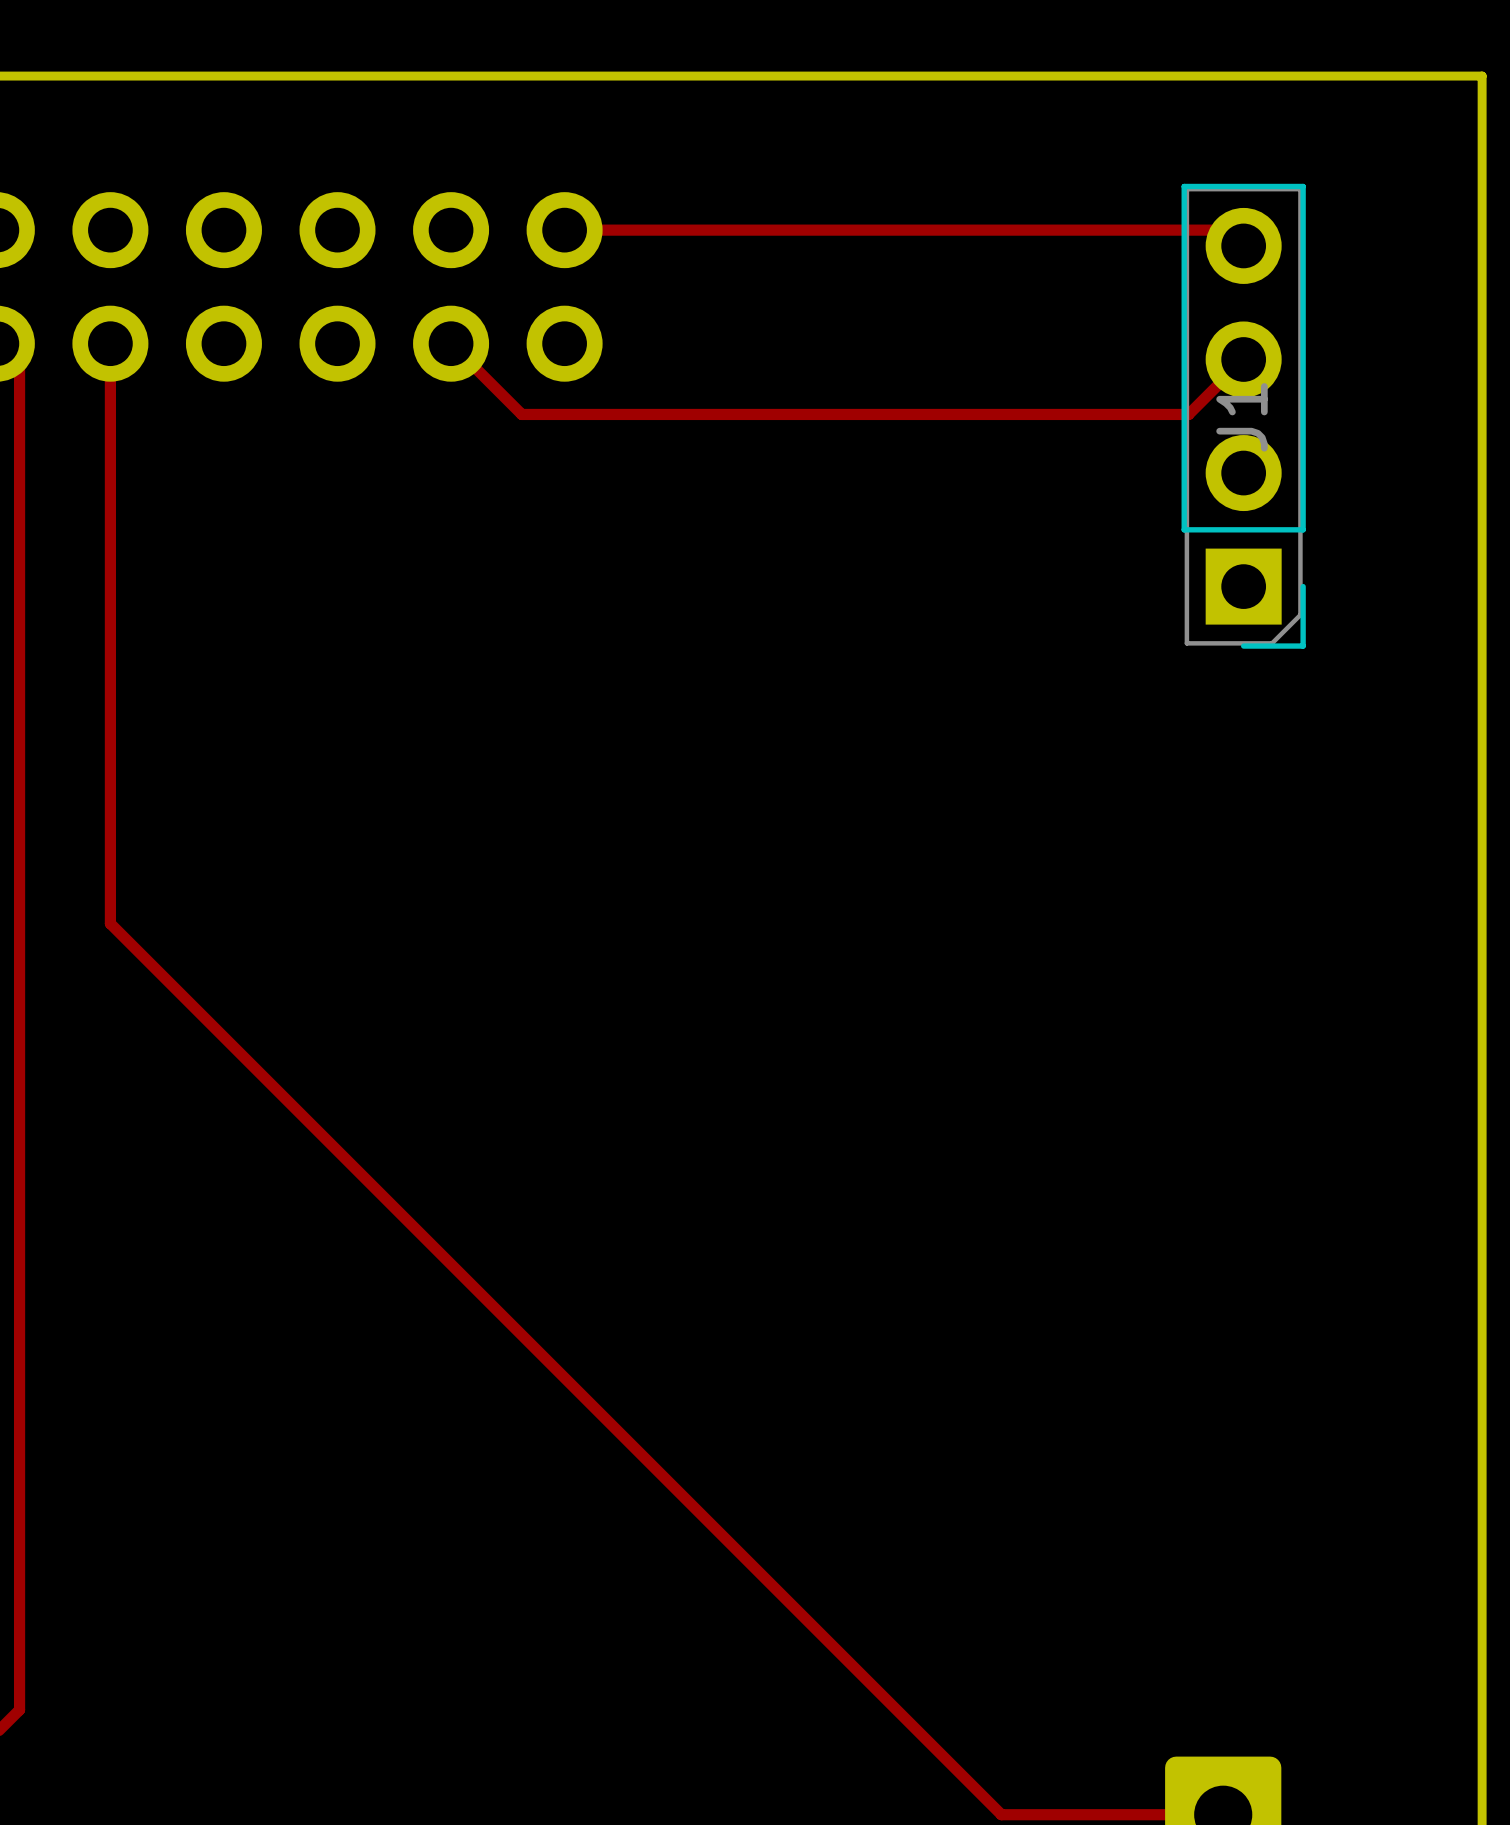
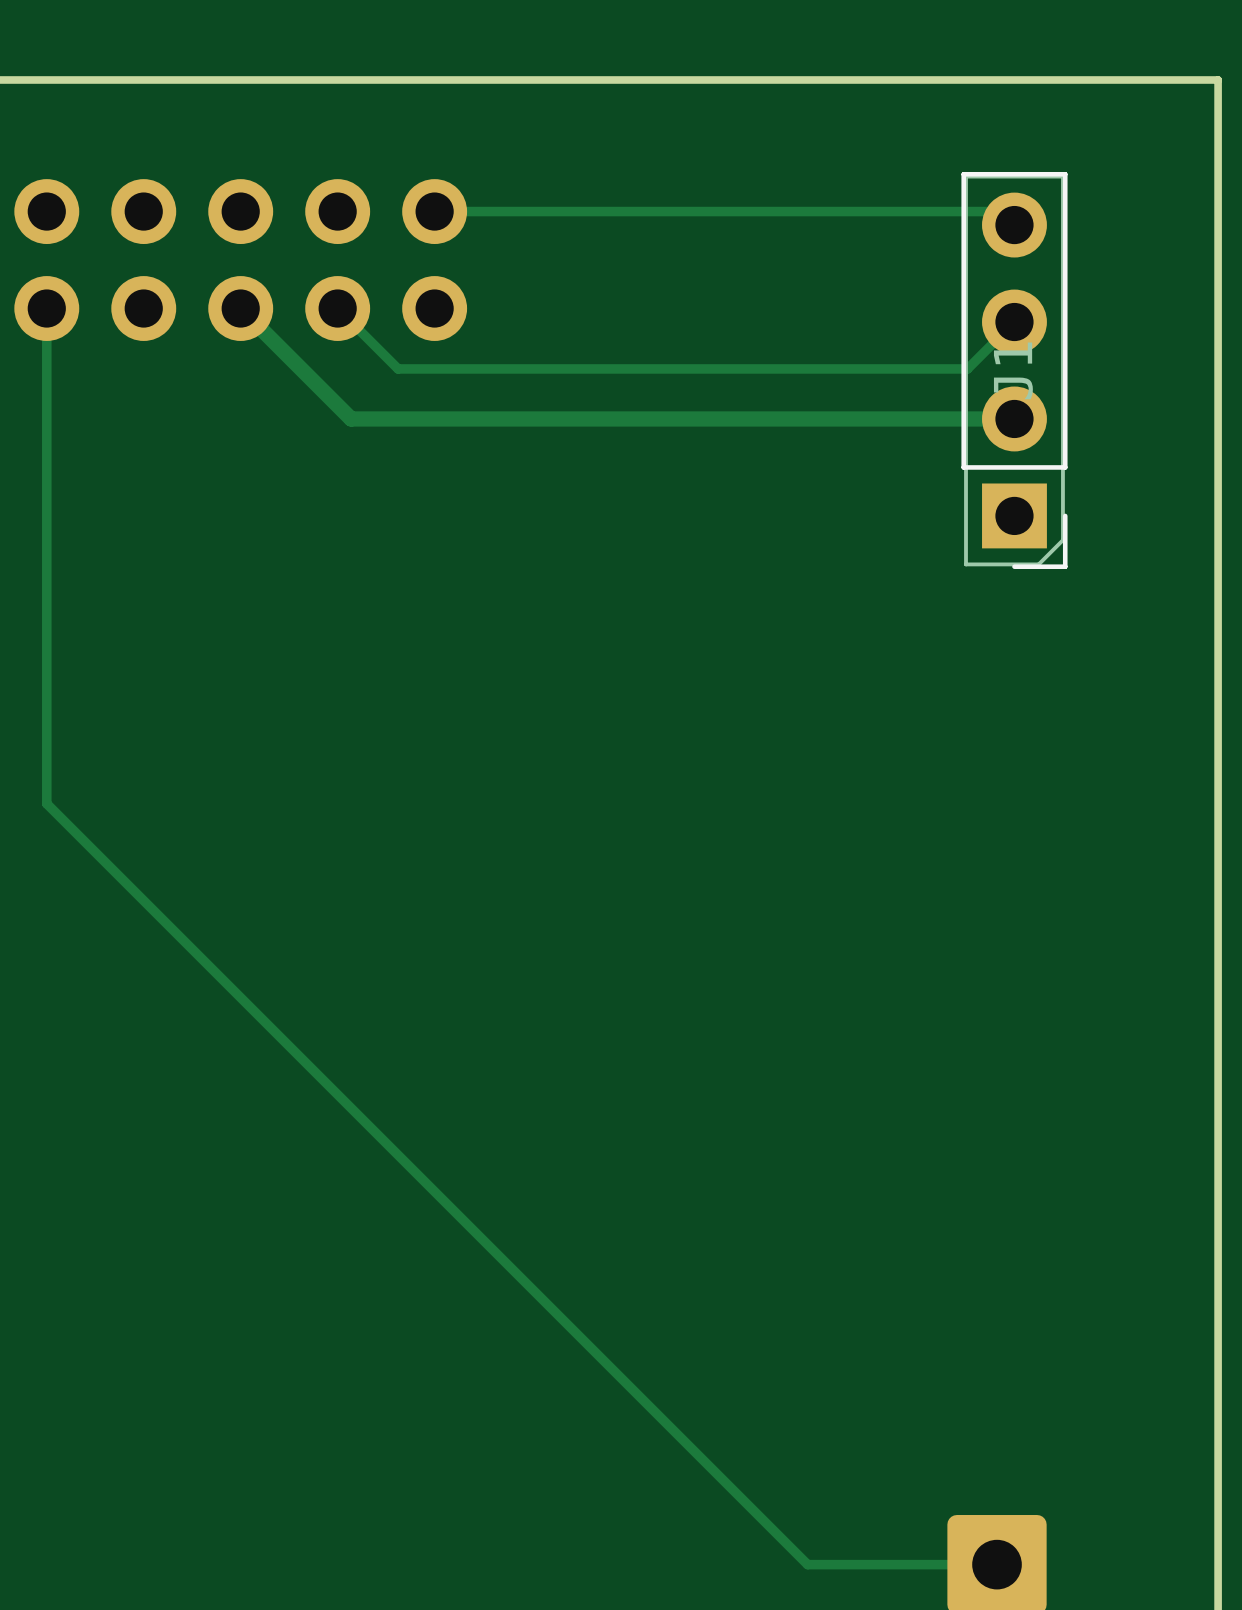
track: none -> (240, 308) (351, 418) (1014, 418)

